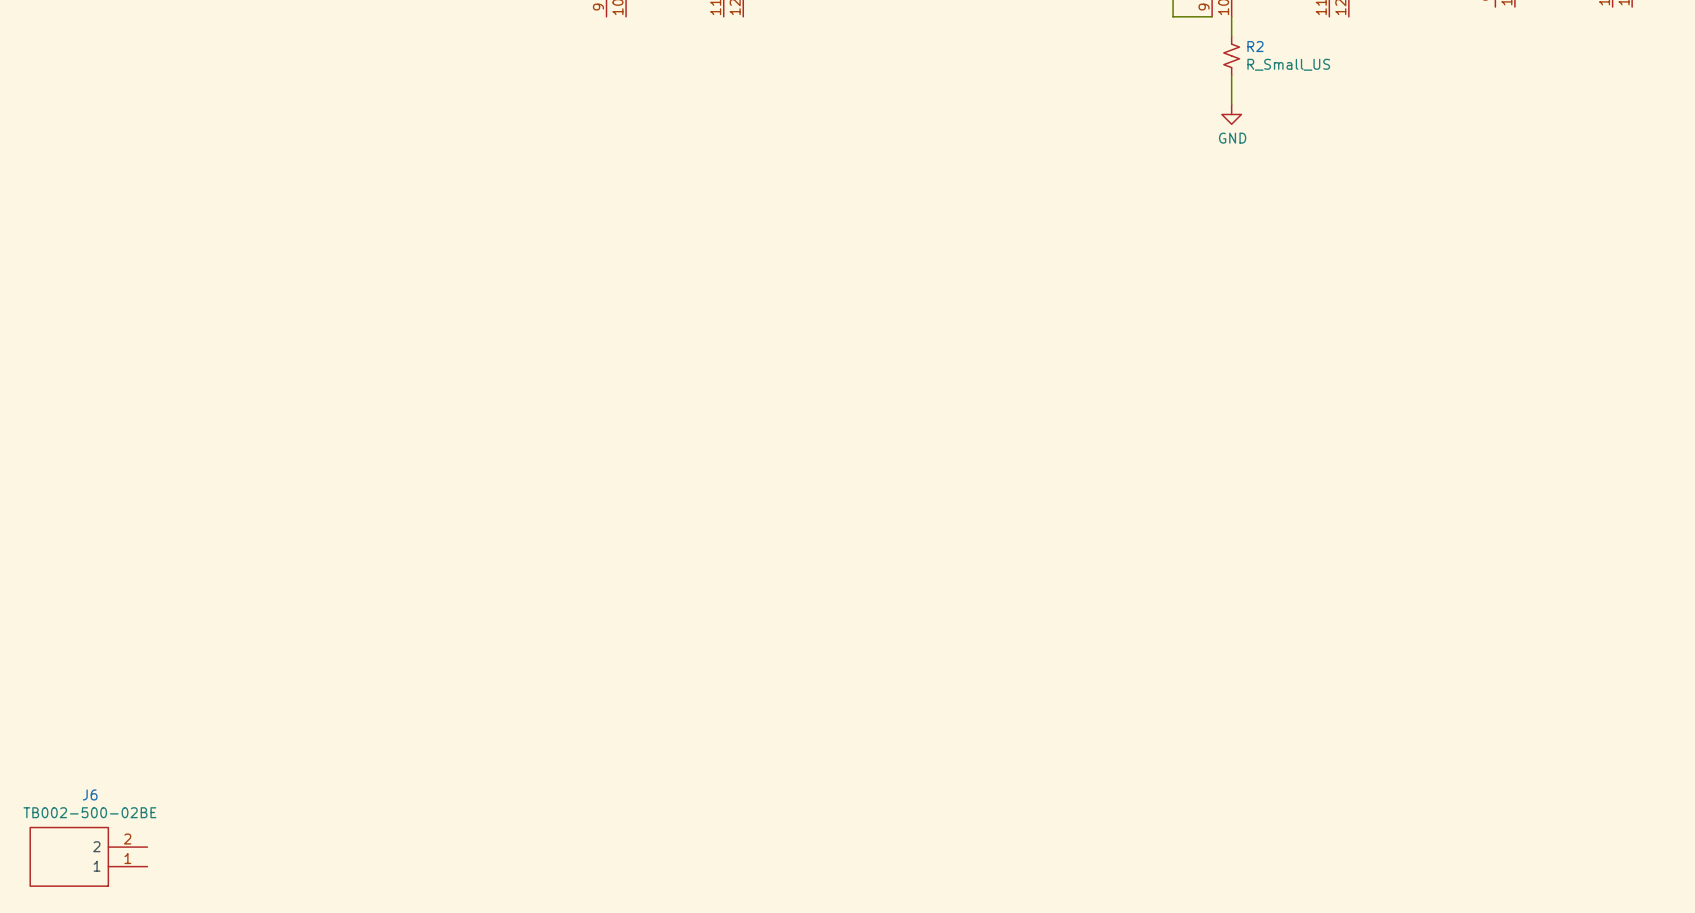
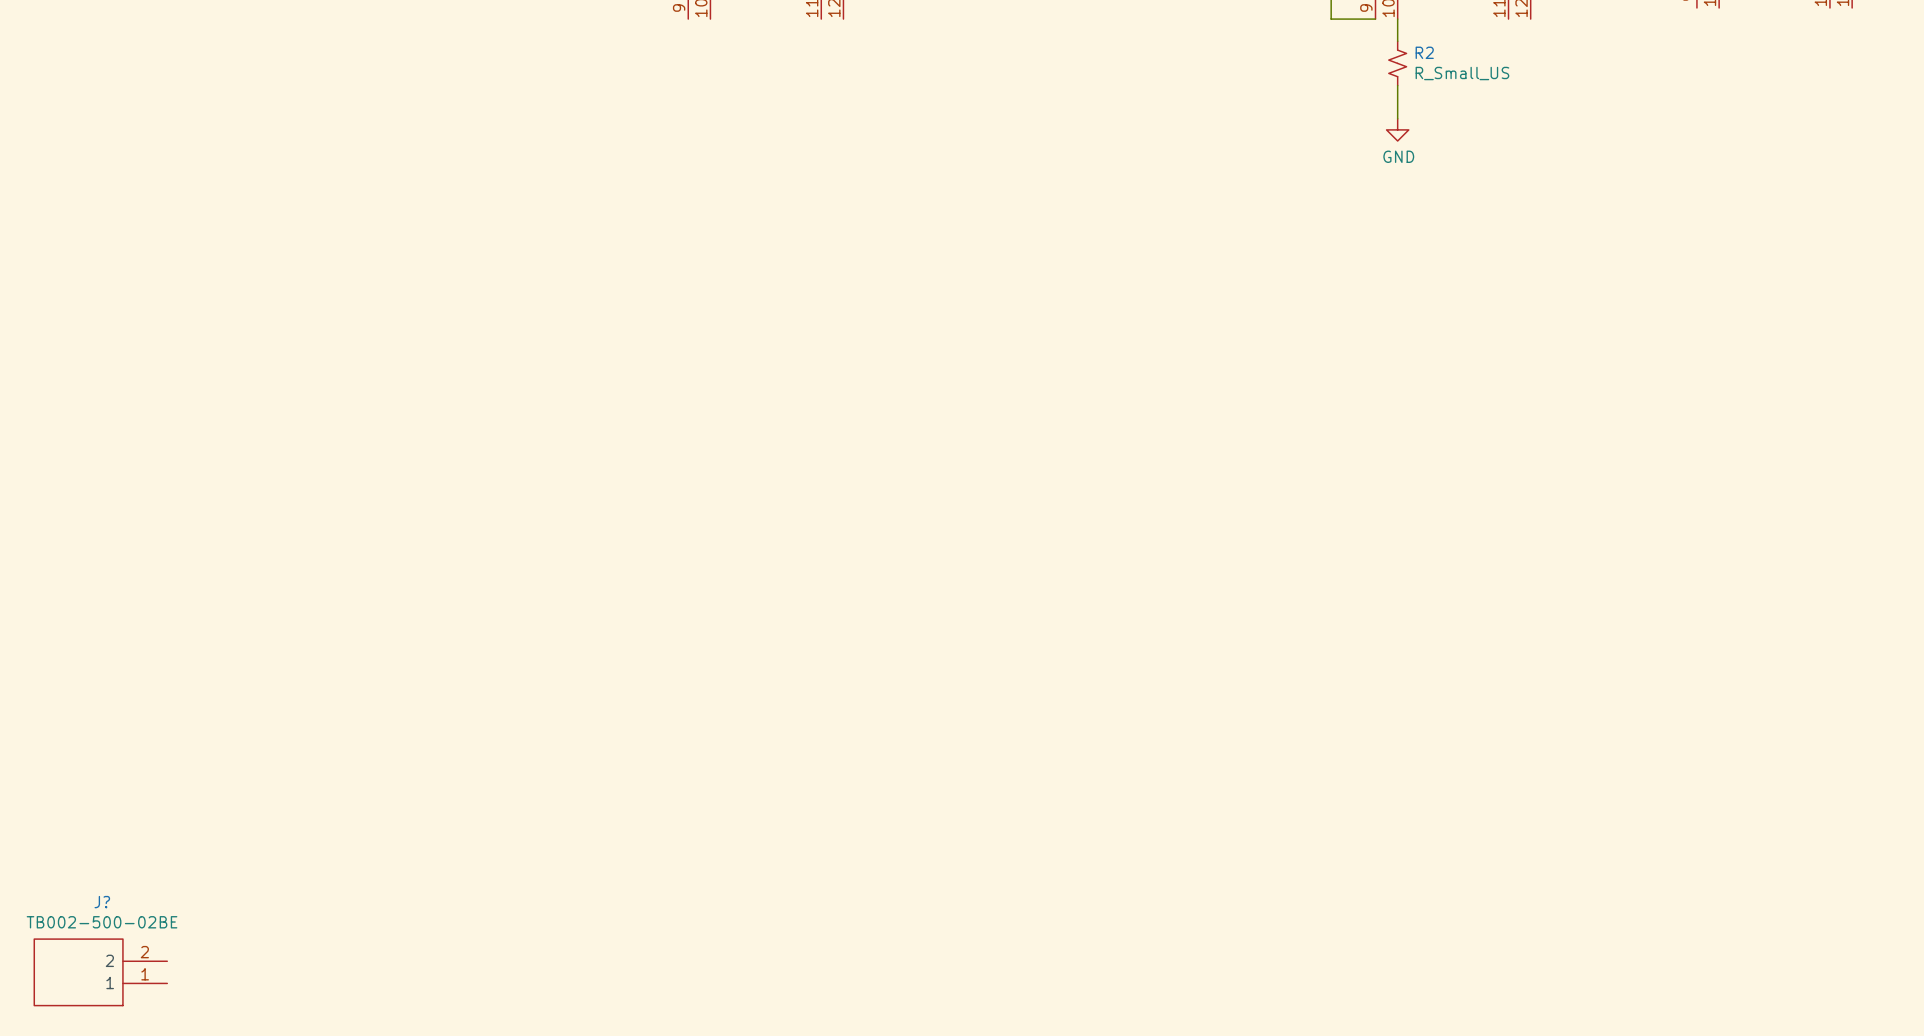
J6 name: J6 (90, 794) -> J? (102, 902)

